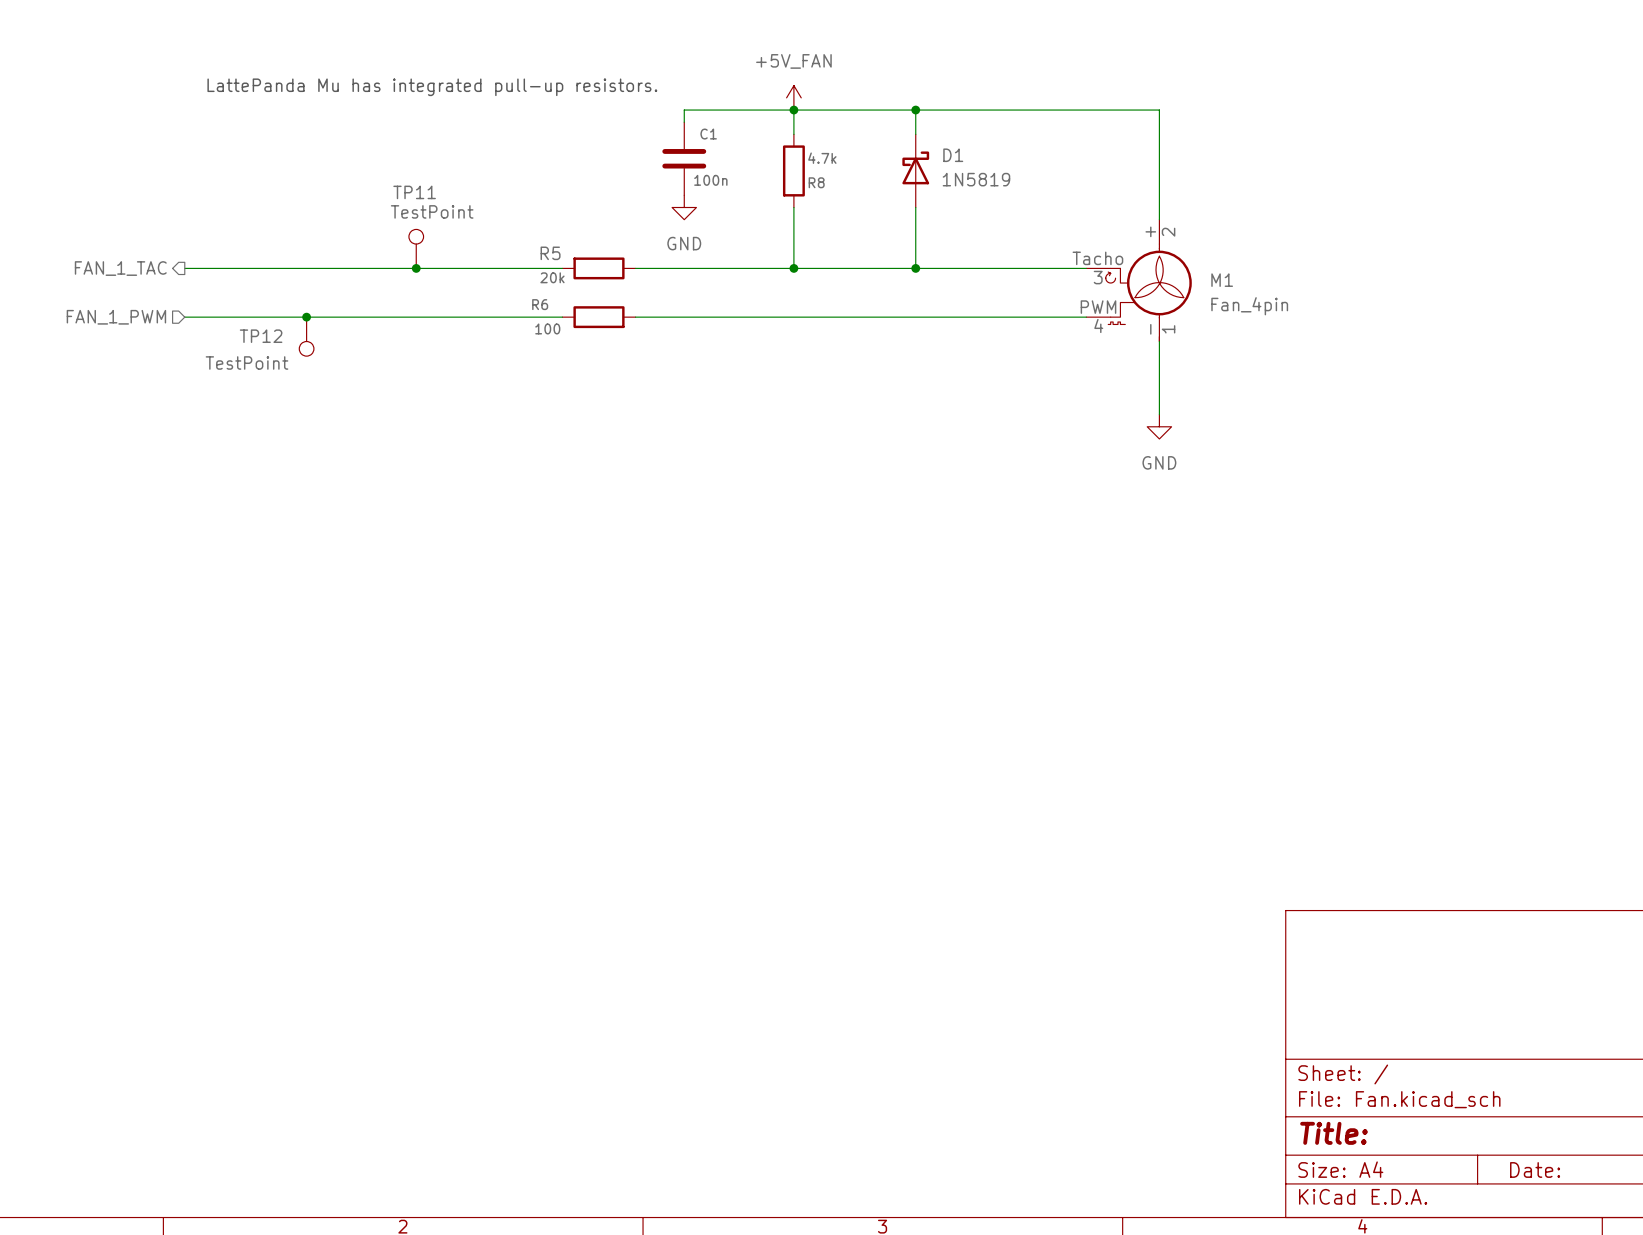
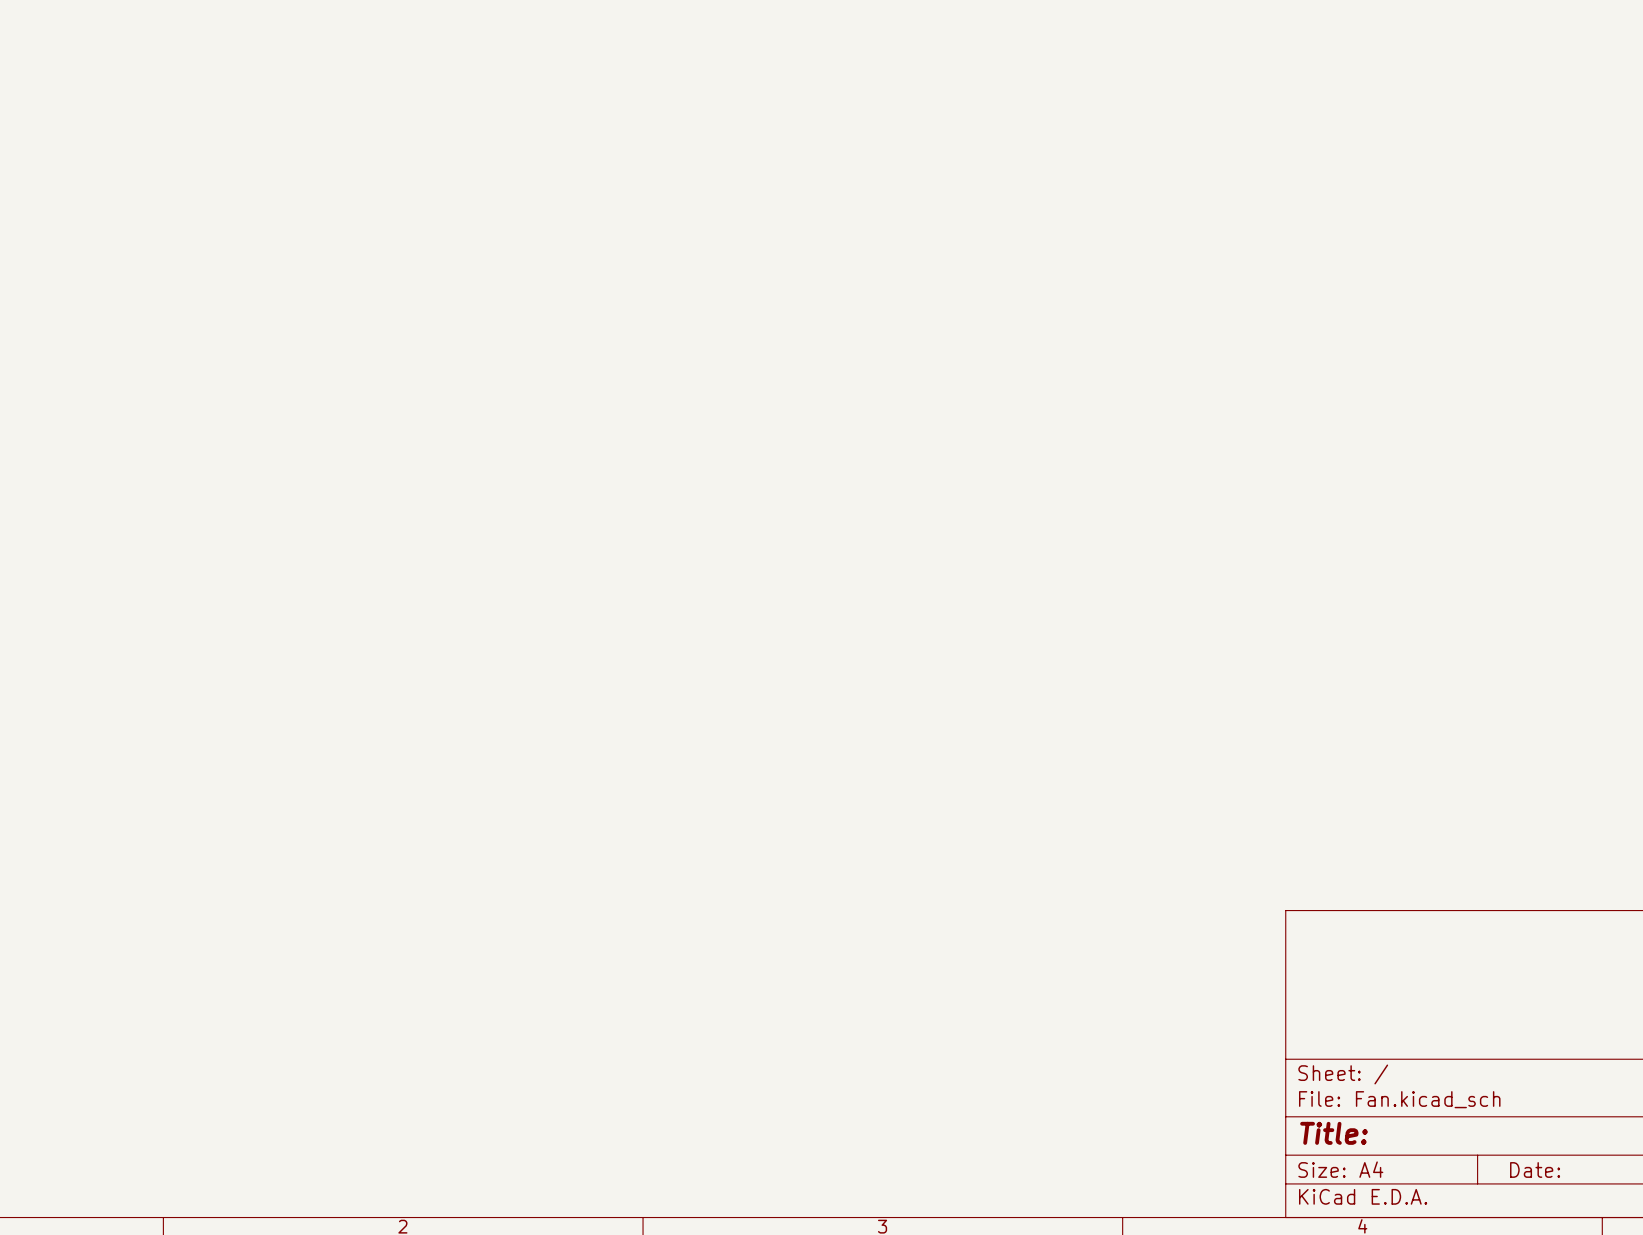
text: LattePanda Mu has integrated pull-up resistors. (432, 87) -> none
power symbol: +5V_FAN (793, 97) -> none
wire: (793, 110) (793, 134) -> none
junction: (793, 110) -> none
wire: (915, 110) (915, 134) -> none
junction: (915, 110) -> none
wire: (684, 122) (684, 110) (1159, 110) (1159, 219) -> none
C1: 100n (684, 158) -> none
R8: 4.7k (793, 170) -> none
D1: 1N5819 (915, 170) -> none
power symbol: GND (684, 207) -> none
wire: (793, 207) (793, 268) -> none
wire: (915, 207) (915, 268) -> none
TP11: TestPoint (416, 248) -> none
hierarchical label: FAN_1_TAC (120, 268) -> none
wire: (184, 268) (562, 268) -> none
junction: (416, 268) -> none
R5: 20k (598, 268) -> none
wire: (635, 268) (1086, 268) -> none
junction: (793, 268) -> none
junction: (915, 268) -> none
M1: Fan_4pin (1139, 280) -> none
hierarchical label: FAN_1_PWM (116, 317) -> none
wire: (184, 317) (562, 317) -> none
junction: (306, 317) -> none
R6: 100 (598, 317) -> none
wire: (635, 317) (1086, 317) -> none
TP12: TestPoint (306, 336) -> none
wire: (1159, 341) (1159, 414) -> none
power symbol: GND (1159, 426) -> none

